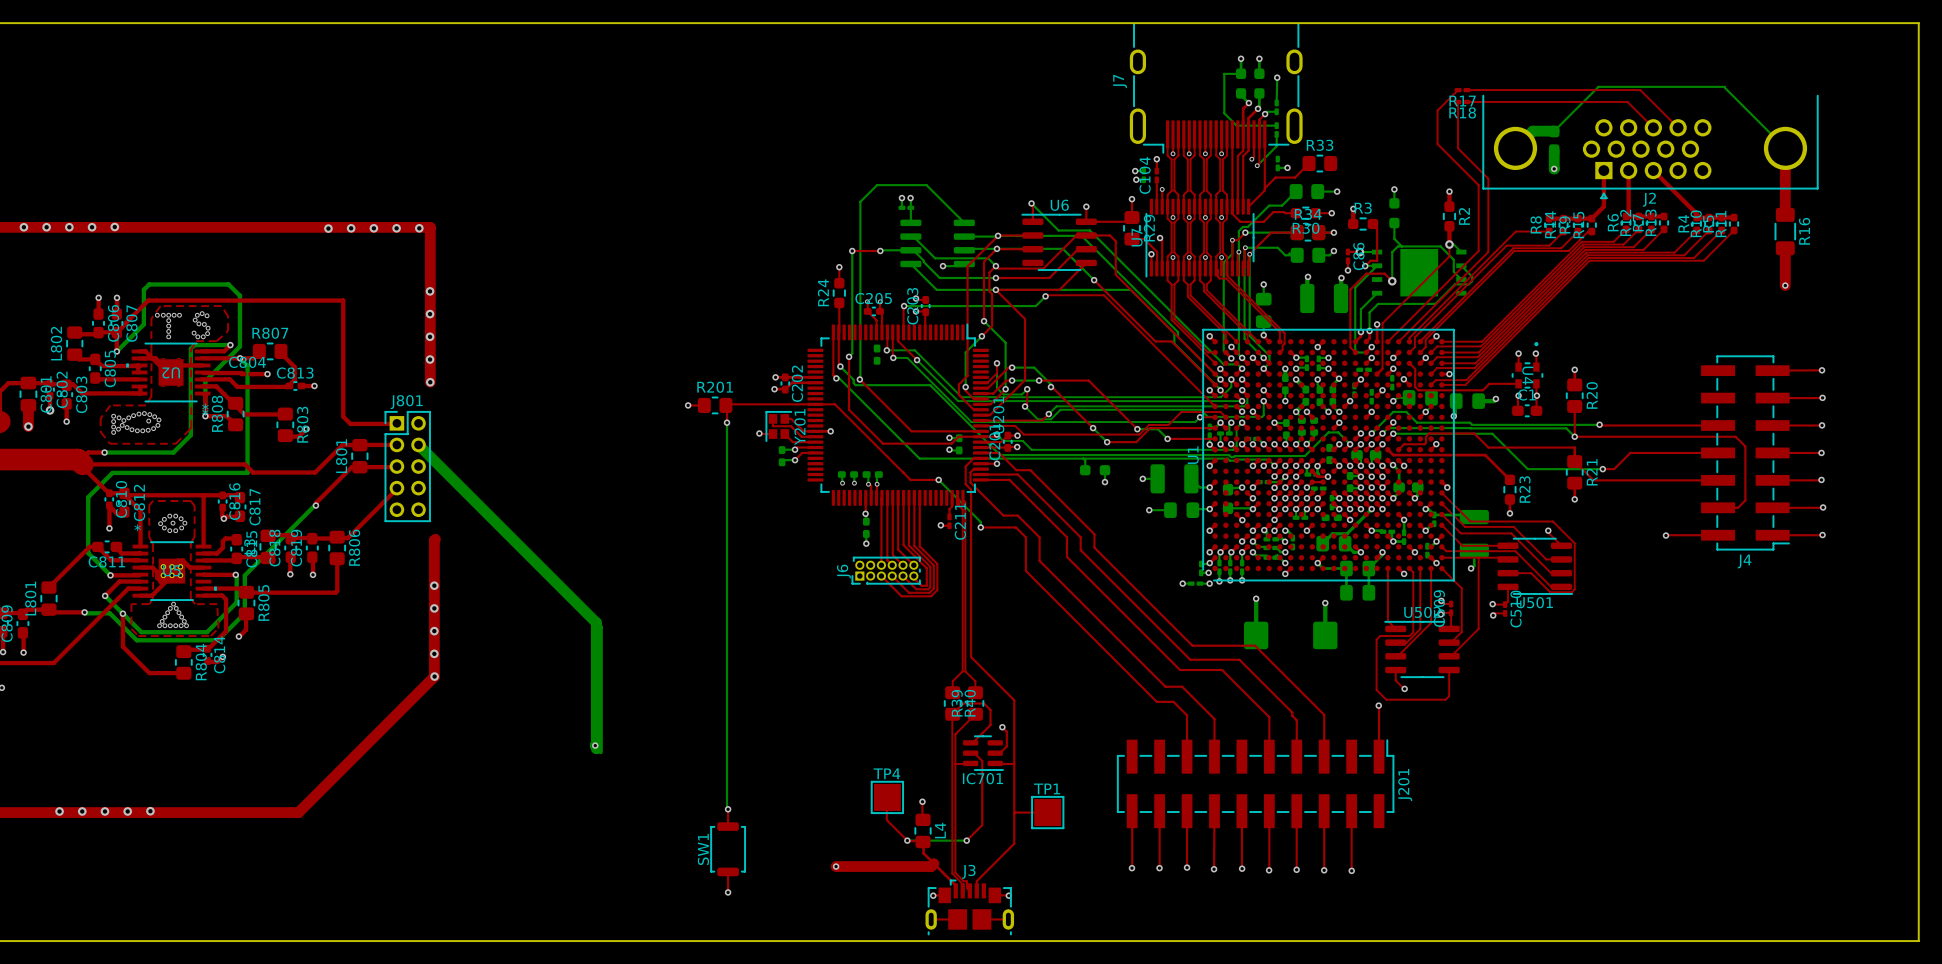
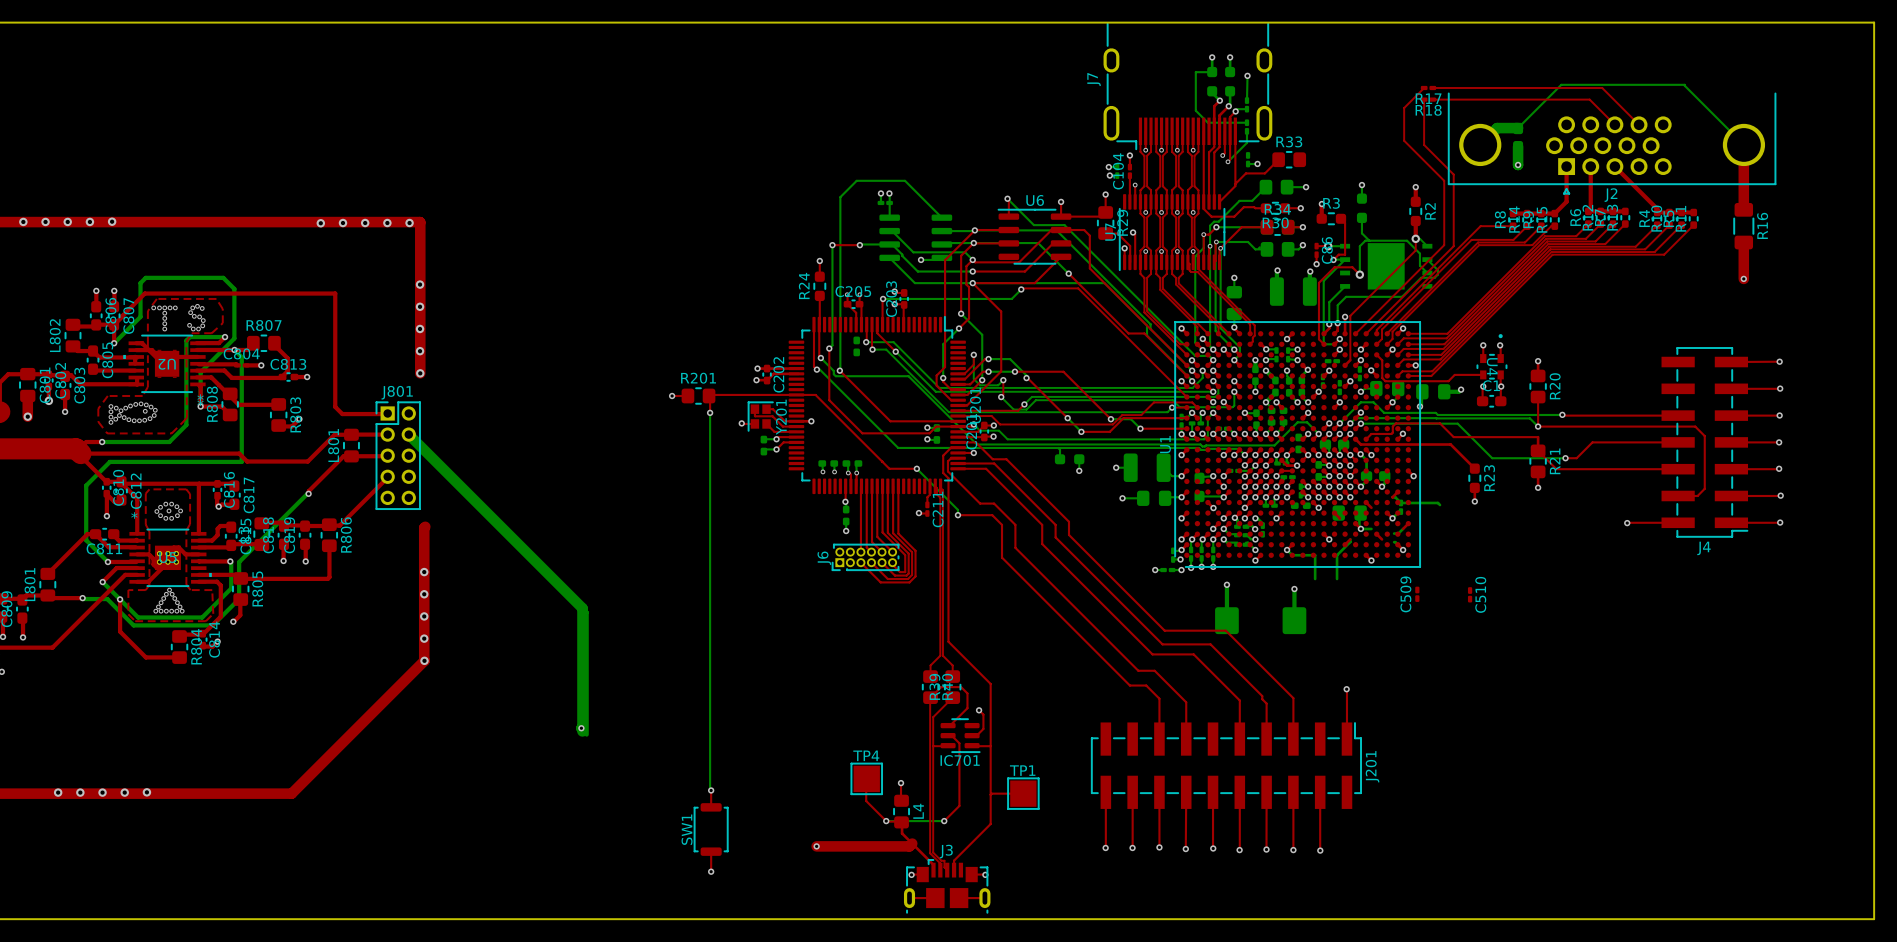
top track: (1441, 492) (1470, 521) (1552, 521) (1574, 543) (1574, 589) (1571, 592) (1550, 592) (1531, 573) (1508, 573) -> none
top track: (1441, 503) (1465, 526) (1513, 526) (1546, 559) (1561, 559) -> none
bottom track: (1371, 509) (1347, 533) (1332, 533) (1322, 543) -> none
via: (1425, 509) -> none
top track: (1441, 514) (1460, 533) (1511, 533) (1551, 573) (1561, 573) -> none
bottom track: (1404, 519) (1404, 532) -> none
via: (1404, 519) -> none
top track: (1441, 525) (1462, 545) (1508, 545) -> none
part footprint: [1379, 529, 1396, 534] -> [1332, 505, 1367, 521]
bottom track: (1371, 530) (1382, 531) -> none
via: (1371, 530) -> none
top track: (1547, 530) (1561, 545) -> none
via: (1548, 530) -> none
part: (1474, 533) -> none
part: (1404, 537) -> none
via: (1436, 541) -> none
part: (1333, 543) -> none
bottom track: (1345, 543) (1353, 552) (1360, 552) -> none
top track: (1441, 546) (1446, 551) (1515, 551) (1551, 586) (1561, 586) -> none
part: (1427, 550) -> none
bottom track: (1474, 550) (1474, 565) (1471, 569) -> none
via: (1382, 552) -> none
via: (1414, 552) -> none
top track: (1441, 557) (1506, 557) (1508, 559) -> none
top track: (1478, 557) (1478, 628) (1449, 656) -> none
U501: (1535, 566) -> none
part: (1357, 568) -> none
top track: (1387, 568) (1387, 621) (1395, 628) -> none
top track: (1409, 568) (1413, 572) (1413, 632) (1409, 635) (1380, 635) (1376, 639) (1376, 689) (1386, 699) (1445, 699) (1449, 696) (1449, 670) -> none
top track: (1420, 568) (1420, 629) (1406, 642) (1395, 642) -> none
top track: (1431, 568) (1431, 622) (1395, 656) -> none
top track: (1441, 568) (1461, 588) (1461, 632) (1449, 642) -> none
via: (1471, 568) -> none
top track: (1508, 586) (1508, 601) (1505, 604) (1493, 604) -> none
part: (1357, 592) -> none
top track: (1441, 600) (1444, 604) (1451, 604) -> none
via: (1441, 600) -> none
via: (1492, 604) -> none
top track: (1505, 613) (1493, 614) -> none
top track: (1440, 614) (1442, 612) (1451, 612) (1451, 627) (1449, 628) -> none
via: (1440, 614) -> none
via: (1493, 615) -> none
U502: (1422, 649) -> none
top track: (1395, 670) (1395, 680) (1404, 689) -> none
via: (1404, 688) -> none

